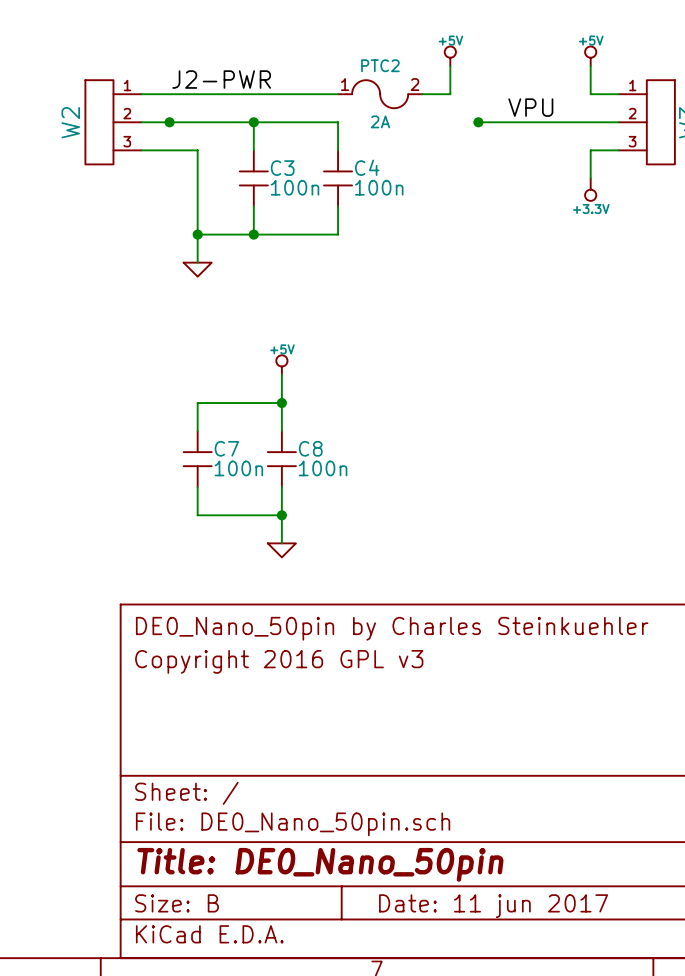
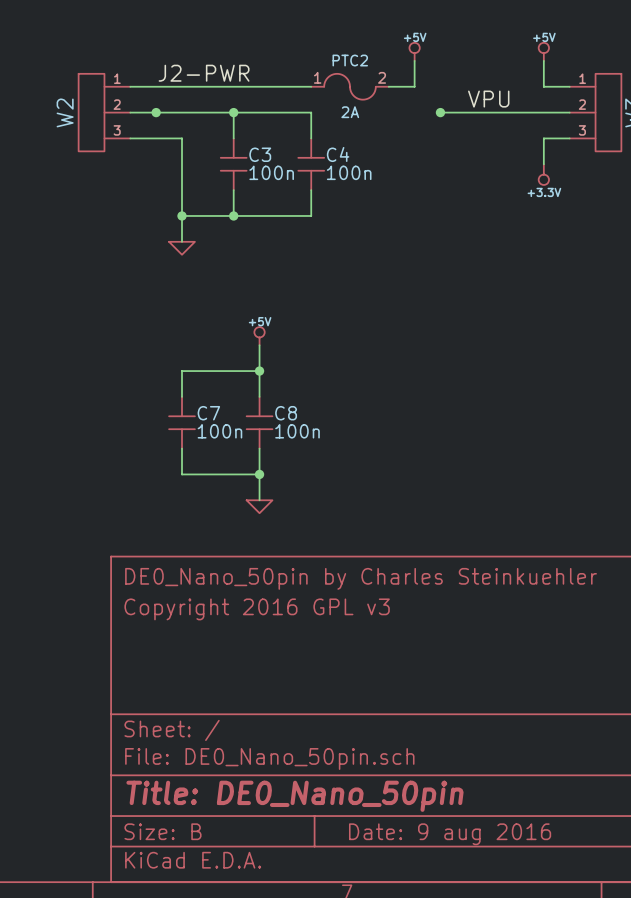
title block: Date: 11 jun 2017 (493, 906) -> Date: 9 aug 2016 (450, 834)

